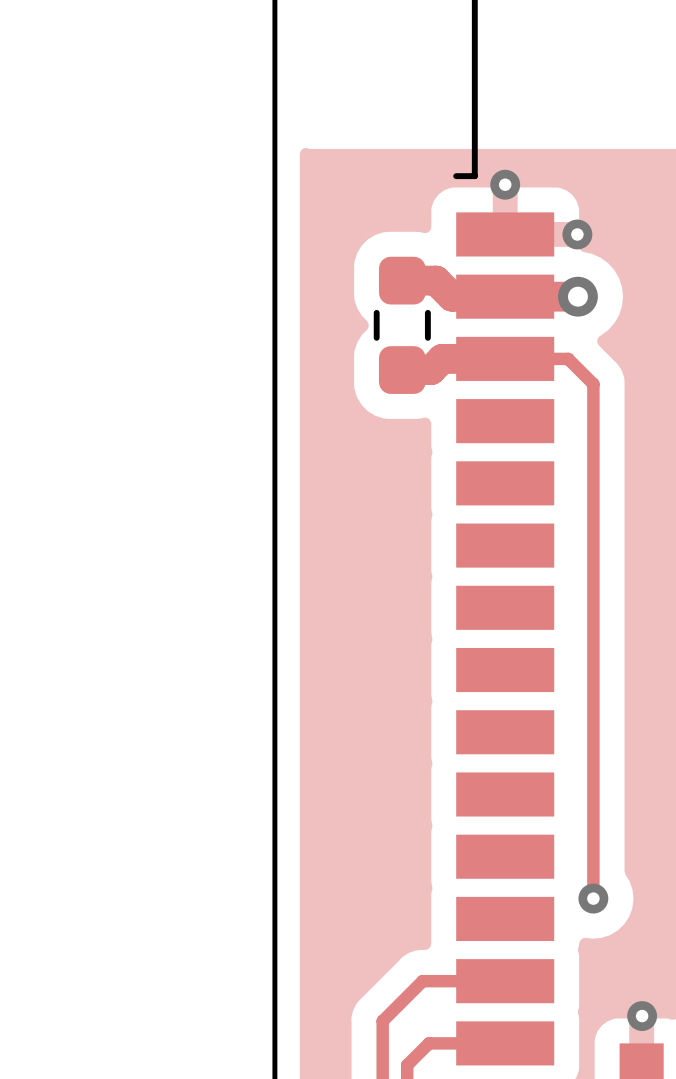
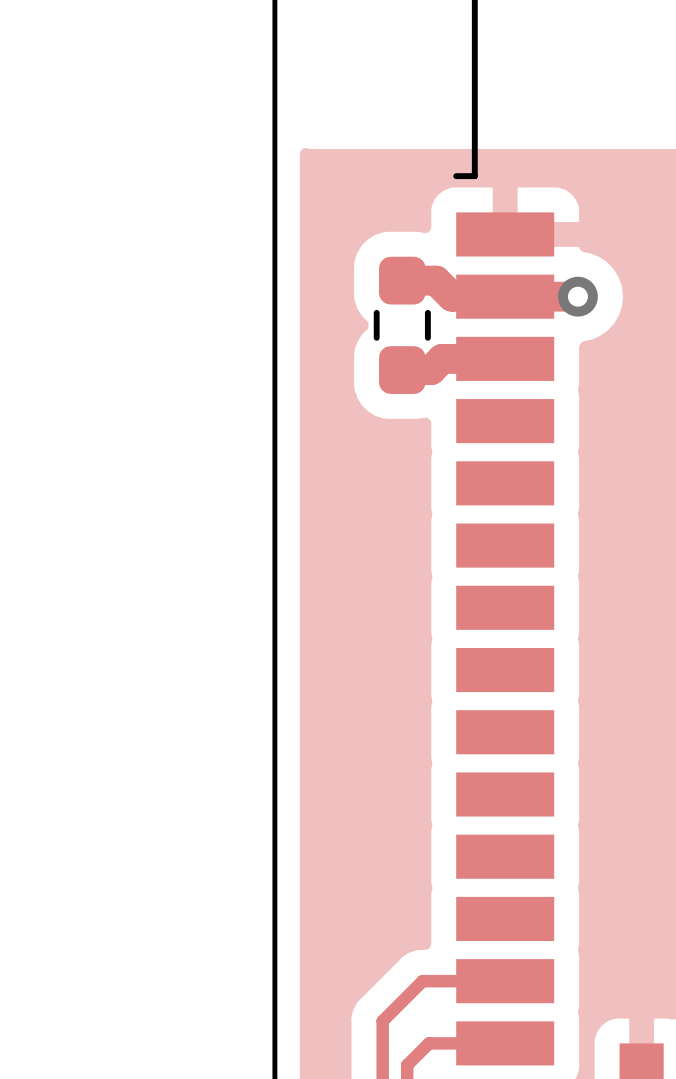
via: (505, 184) -> none
via: (577, 234) -> none
track: (505, 358) (568, 358) (593, 384) (593, 898) -> none
via: (593, 898) -> none
via: (642, 1016) -> none

